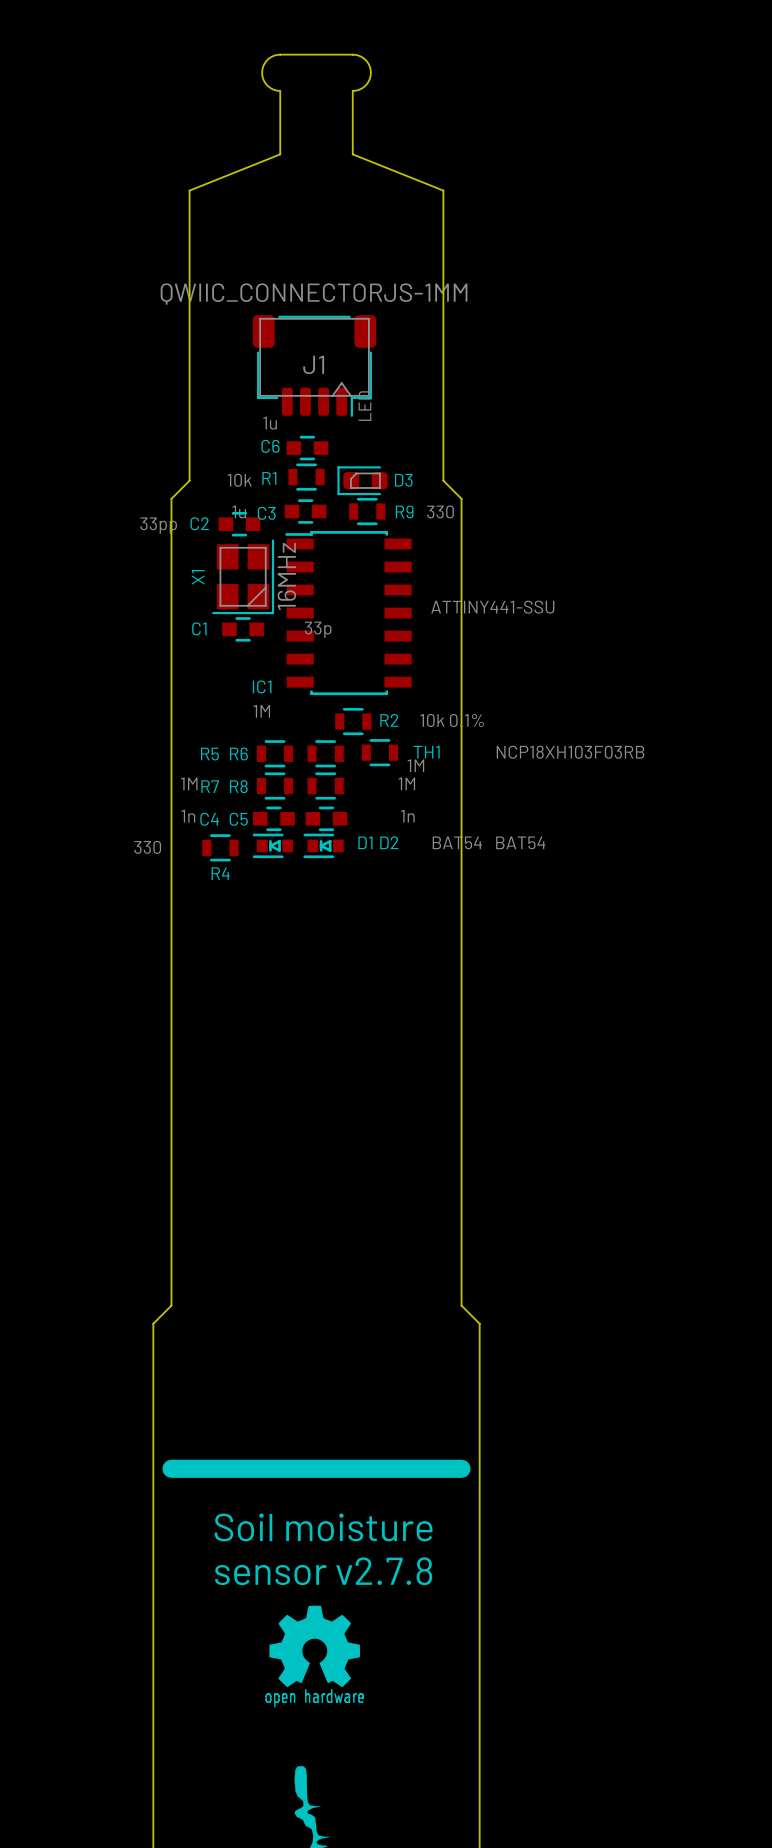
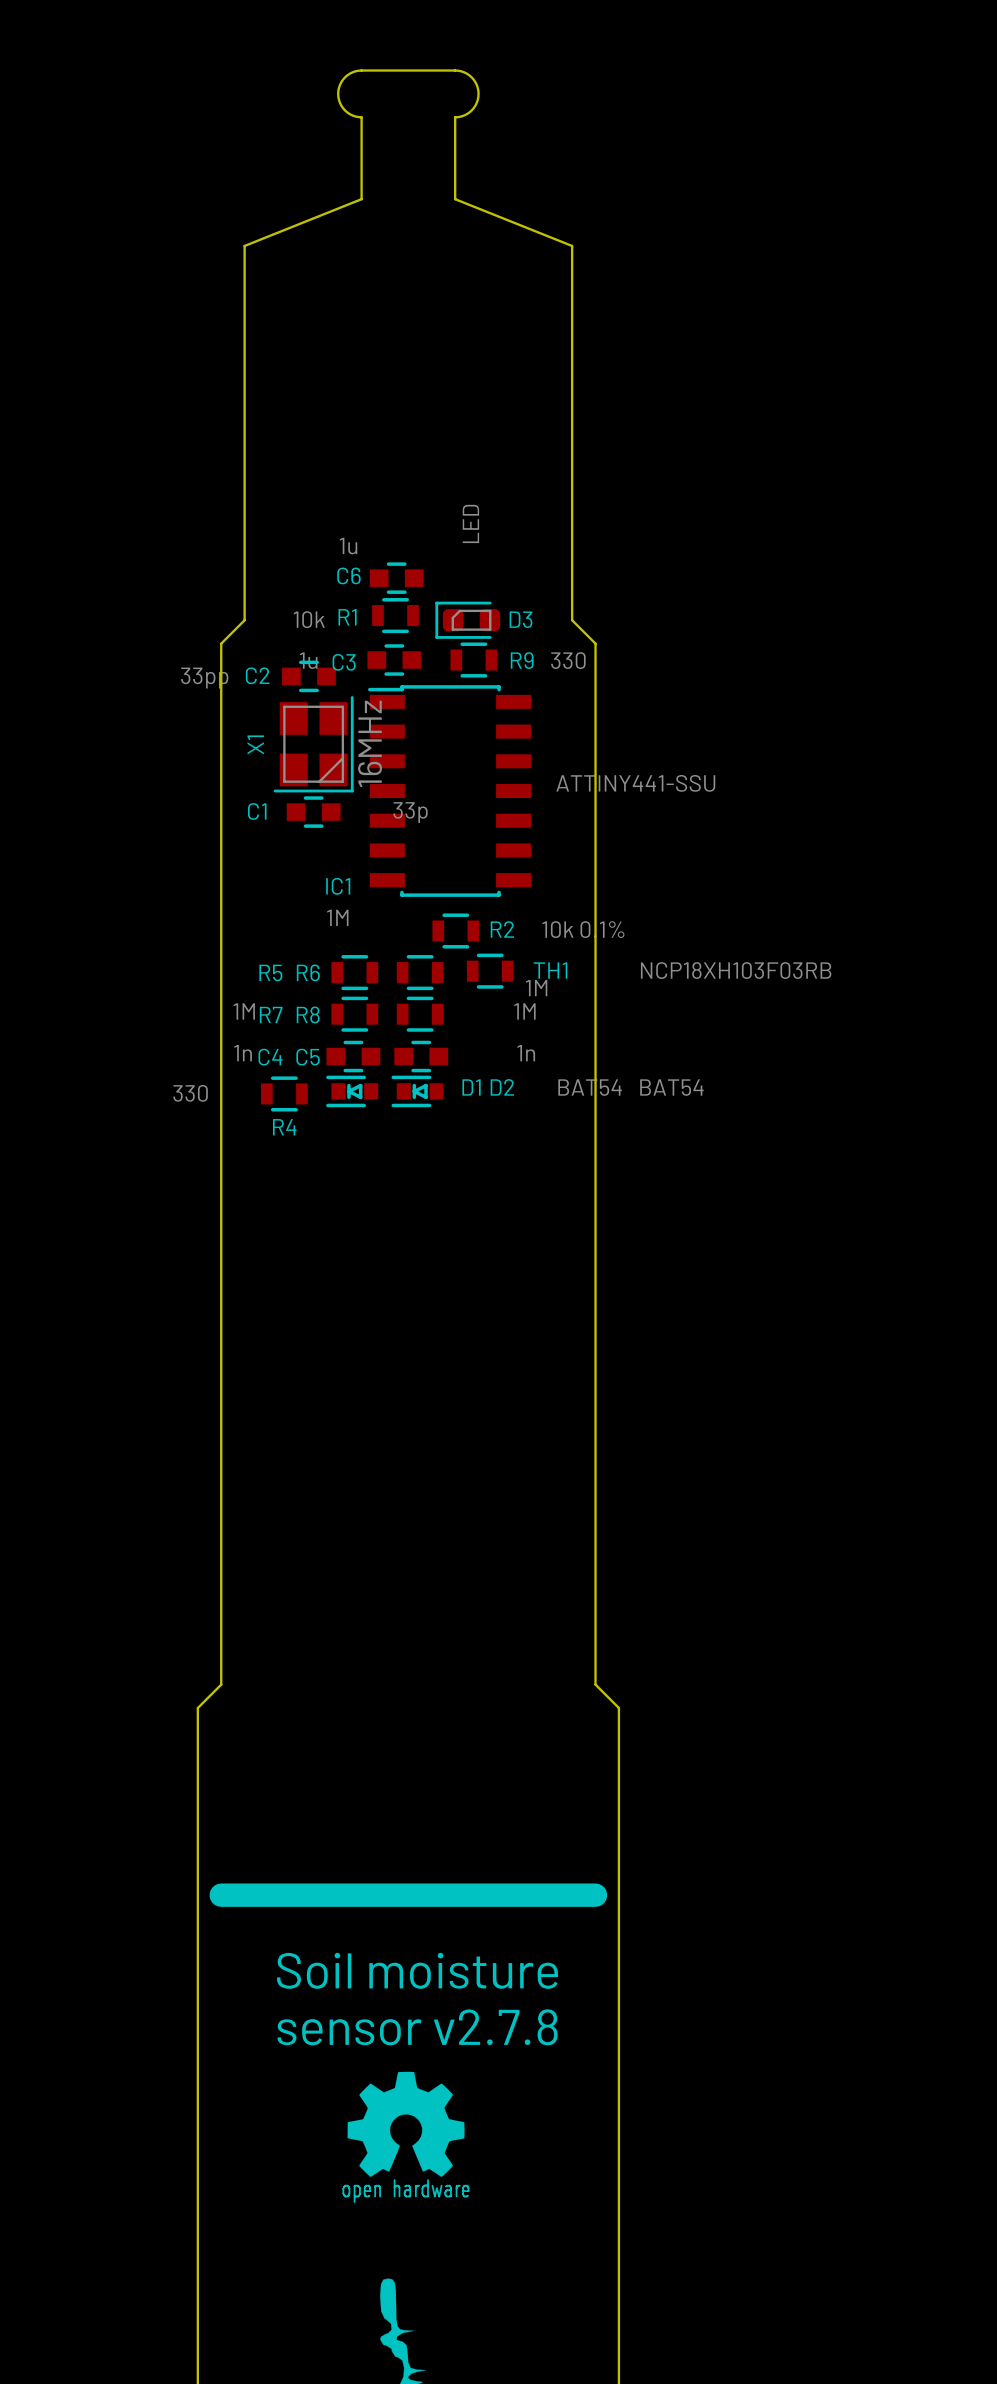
J1: QWIIC_CONNECTORJS-1MM (314, 366) -> none

